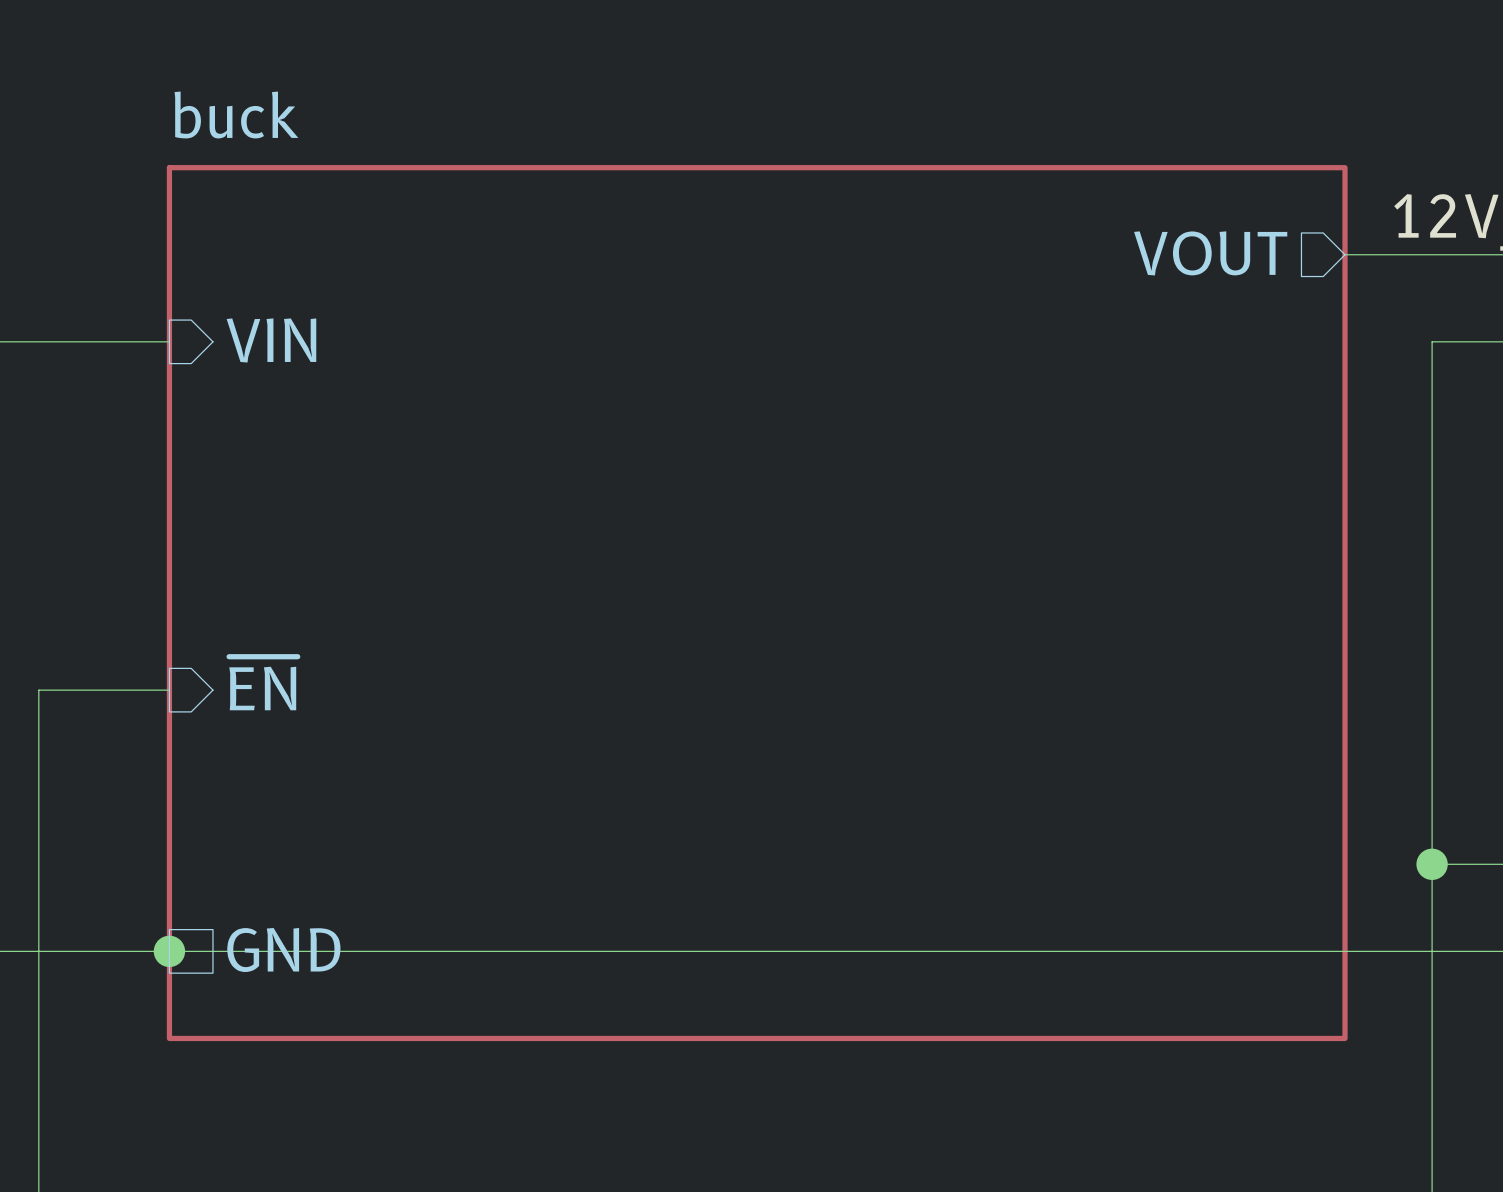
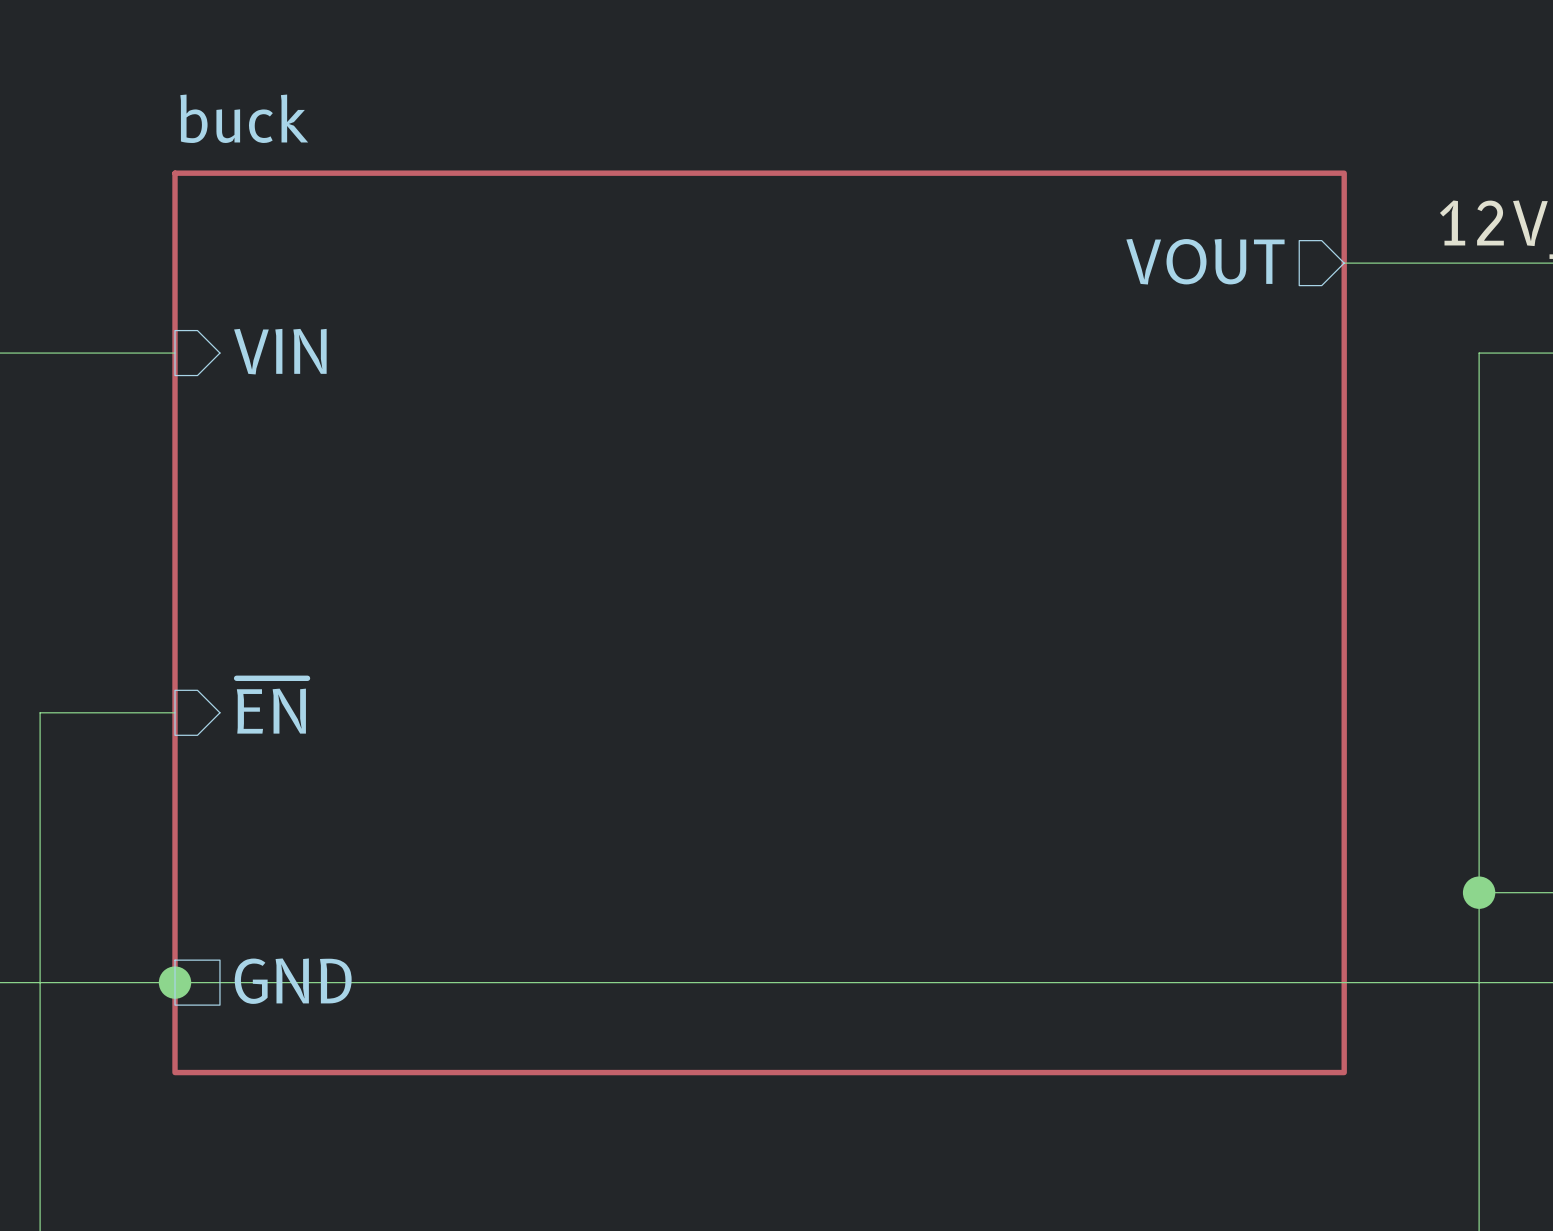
sheet buck shape: [166, 165, 1348, 1042] -> [172, 170, 1347, 1076]
sheet pin position: VOUT (1210, 253) -> VOUT (1205, 261)
wire: none -> (1344, 263) (1389, 263)

